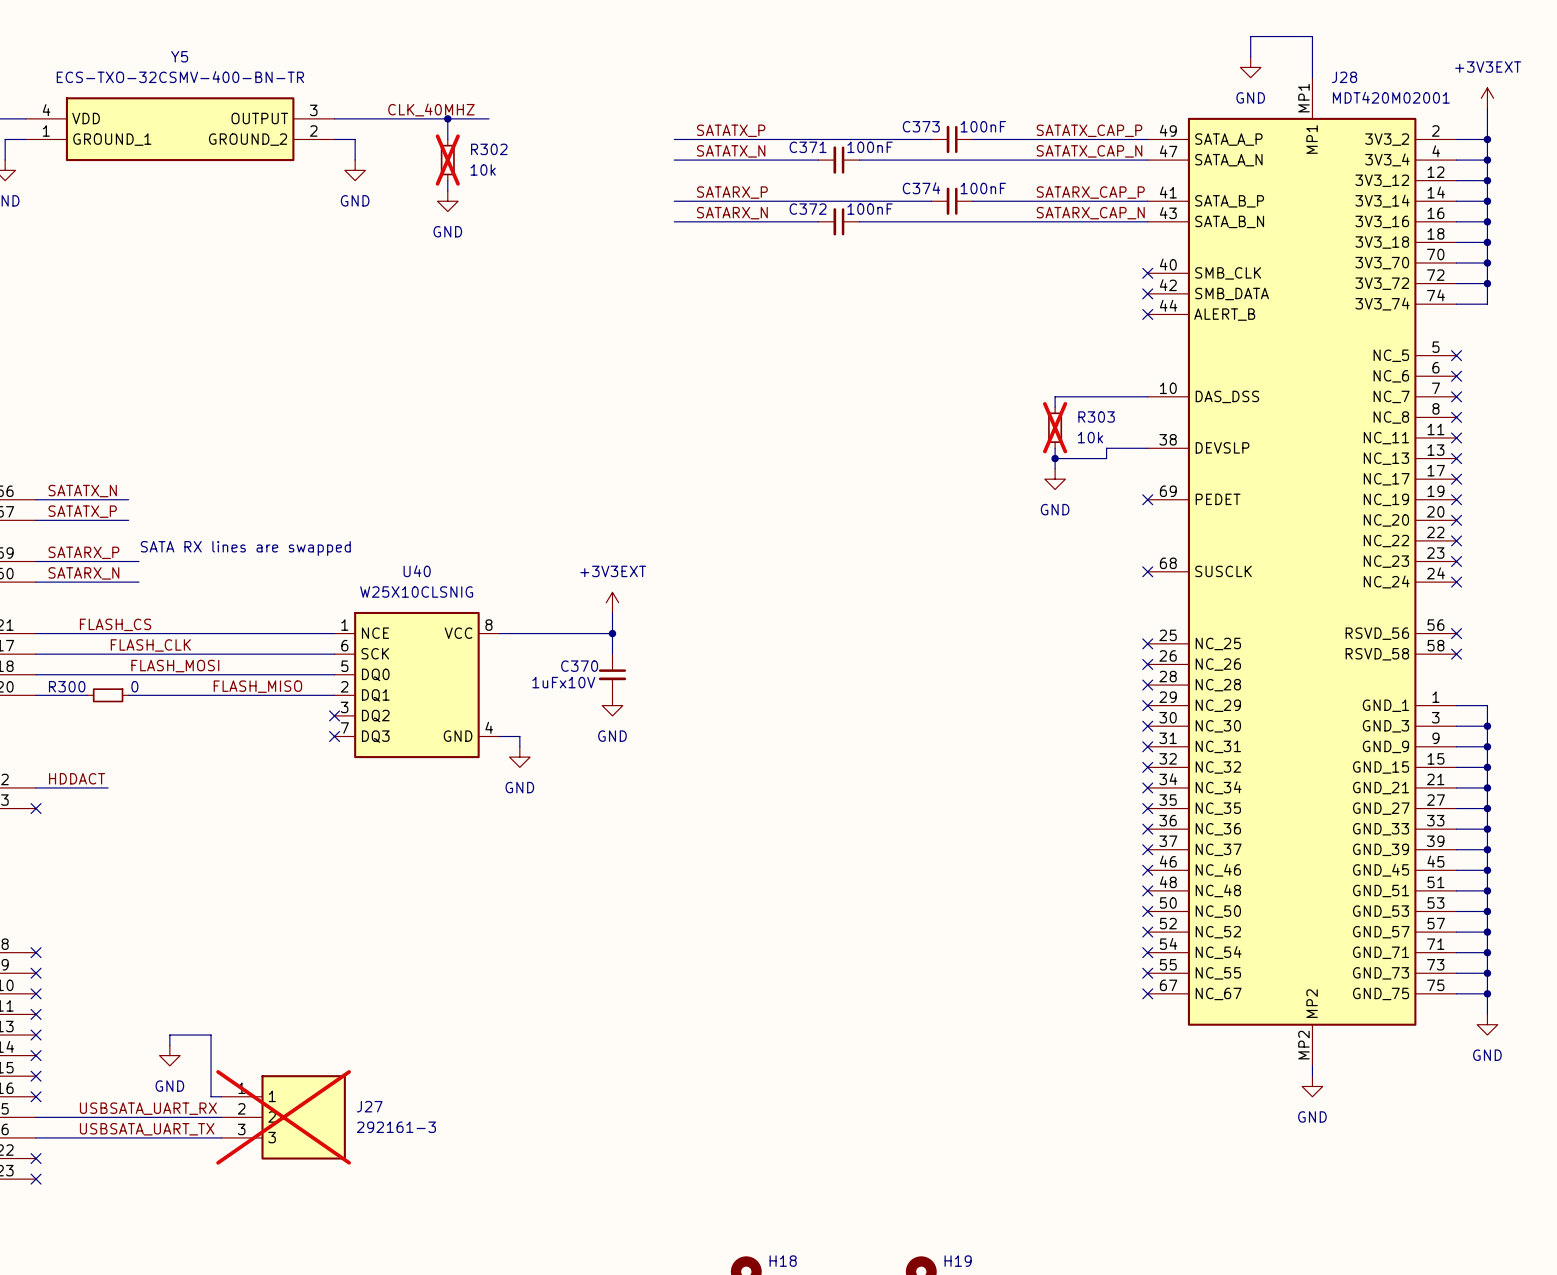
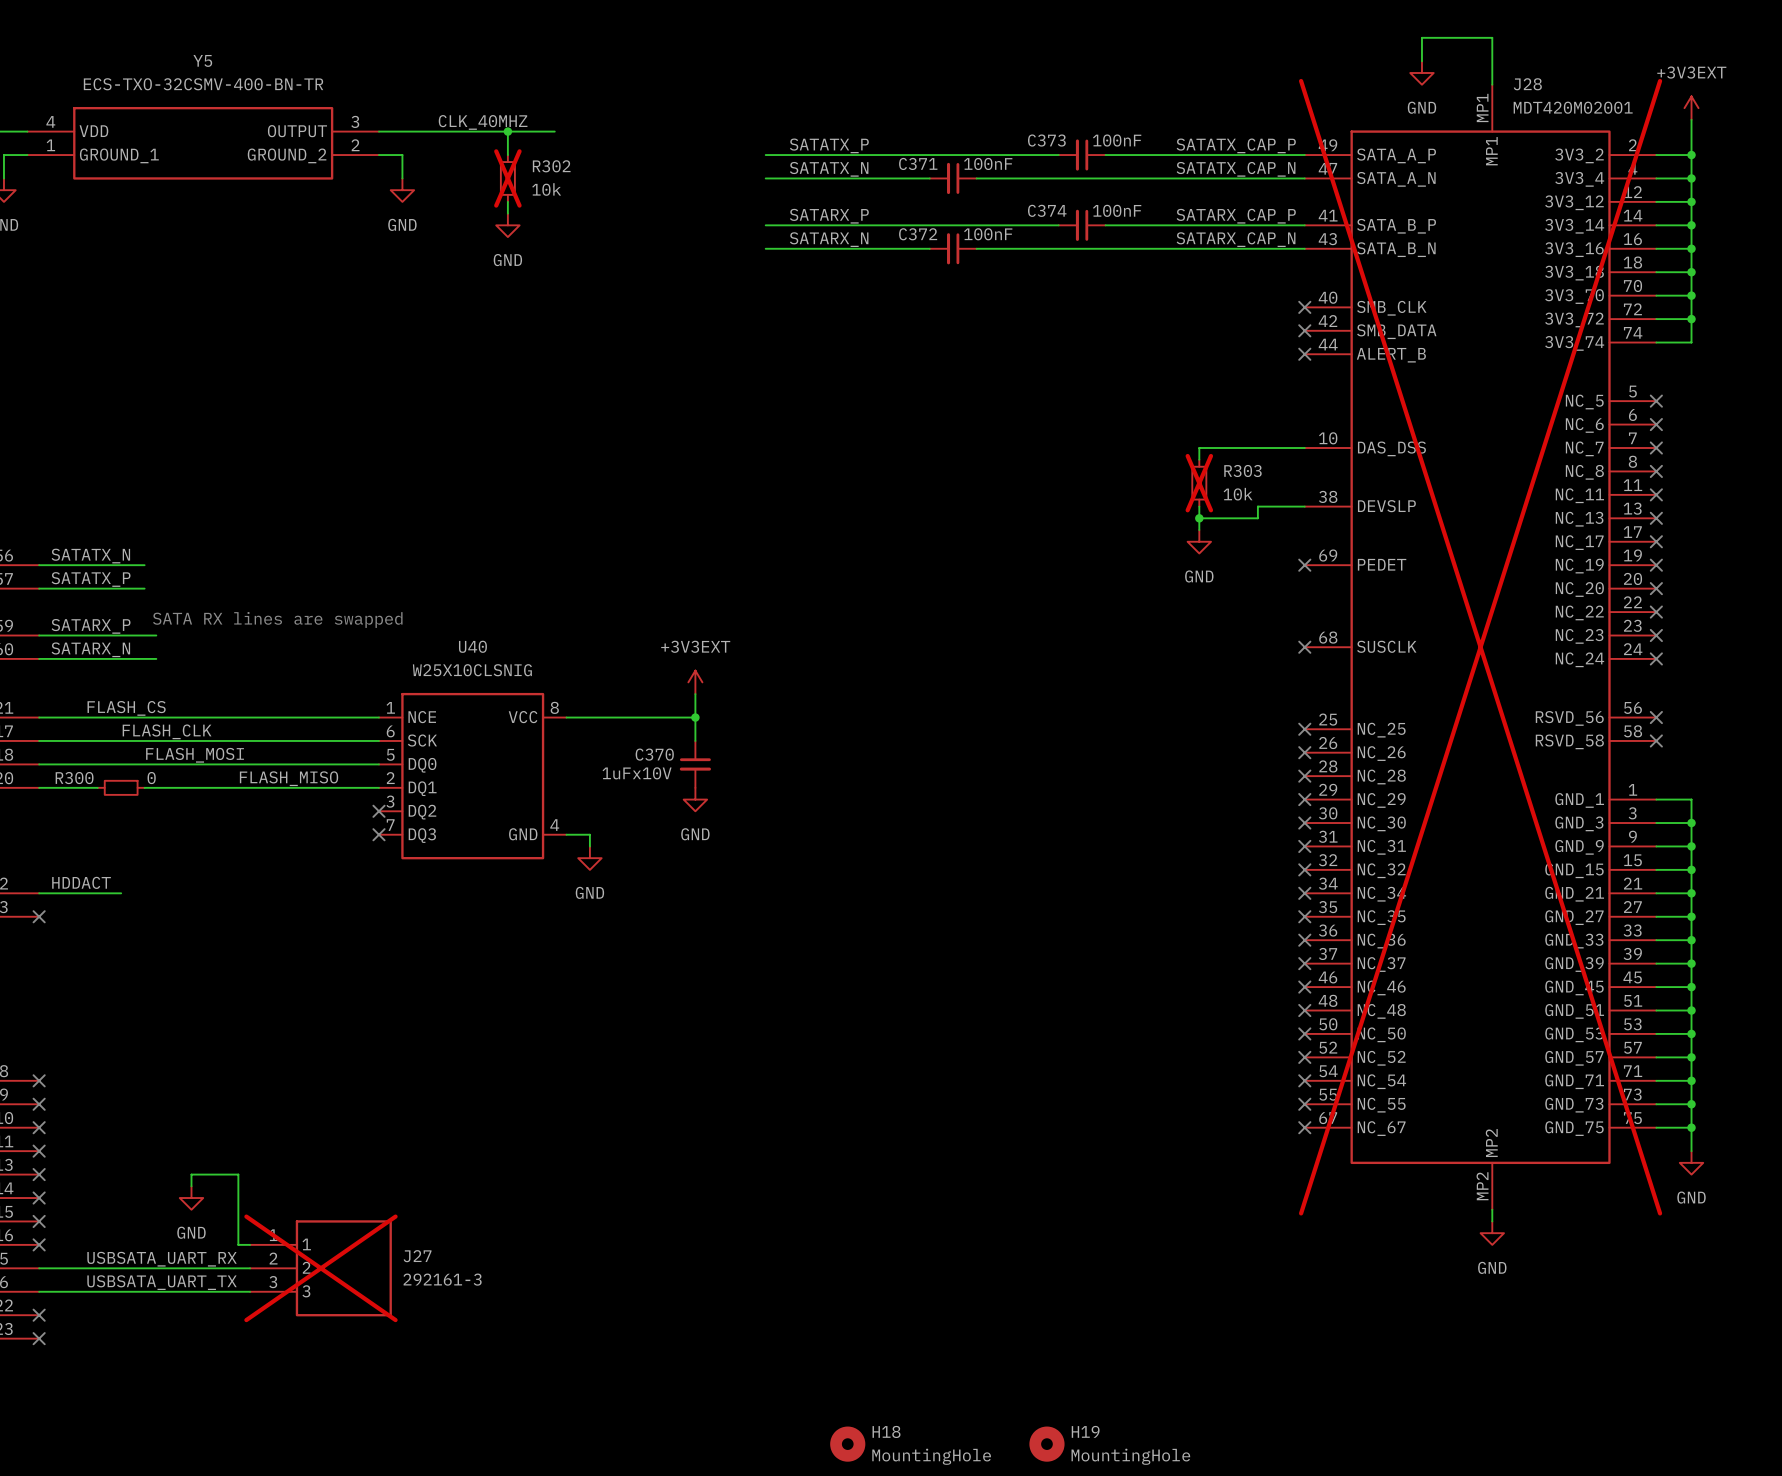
J28 do-not-place cross: none -> (1480, 647)

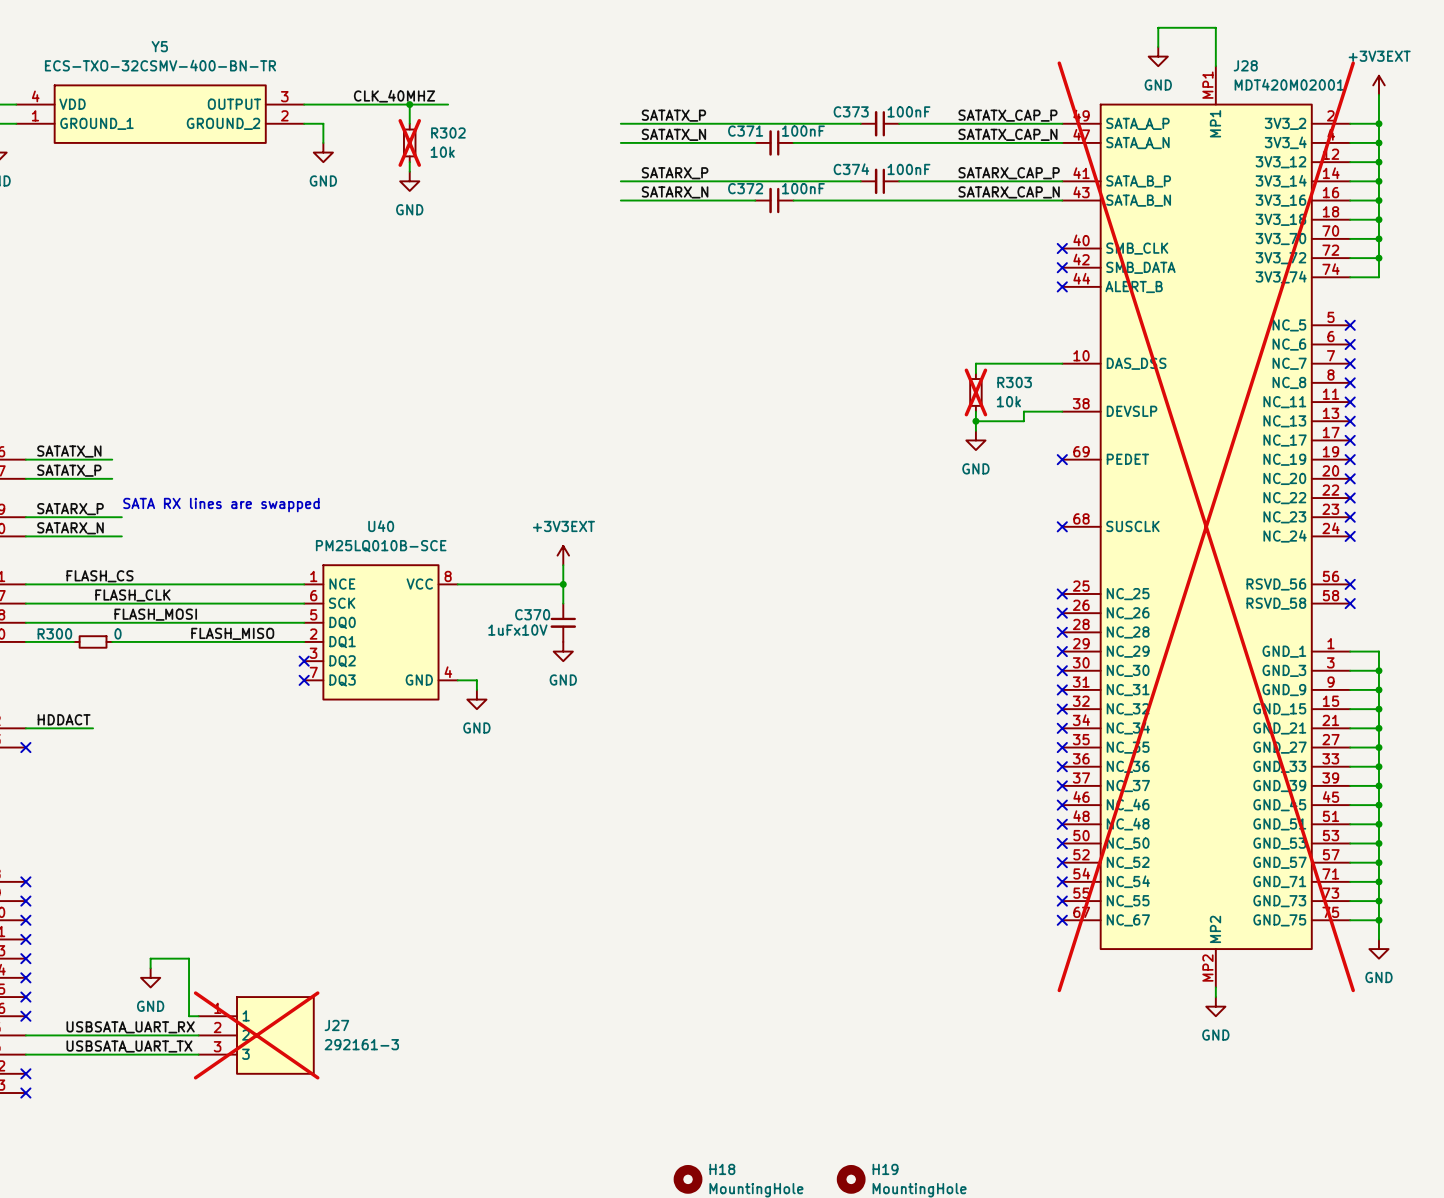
U40 value: W25X10CLSNIG (472, 670) -> PM25LQ010B-SCE (381, 546)

